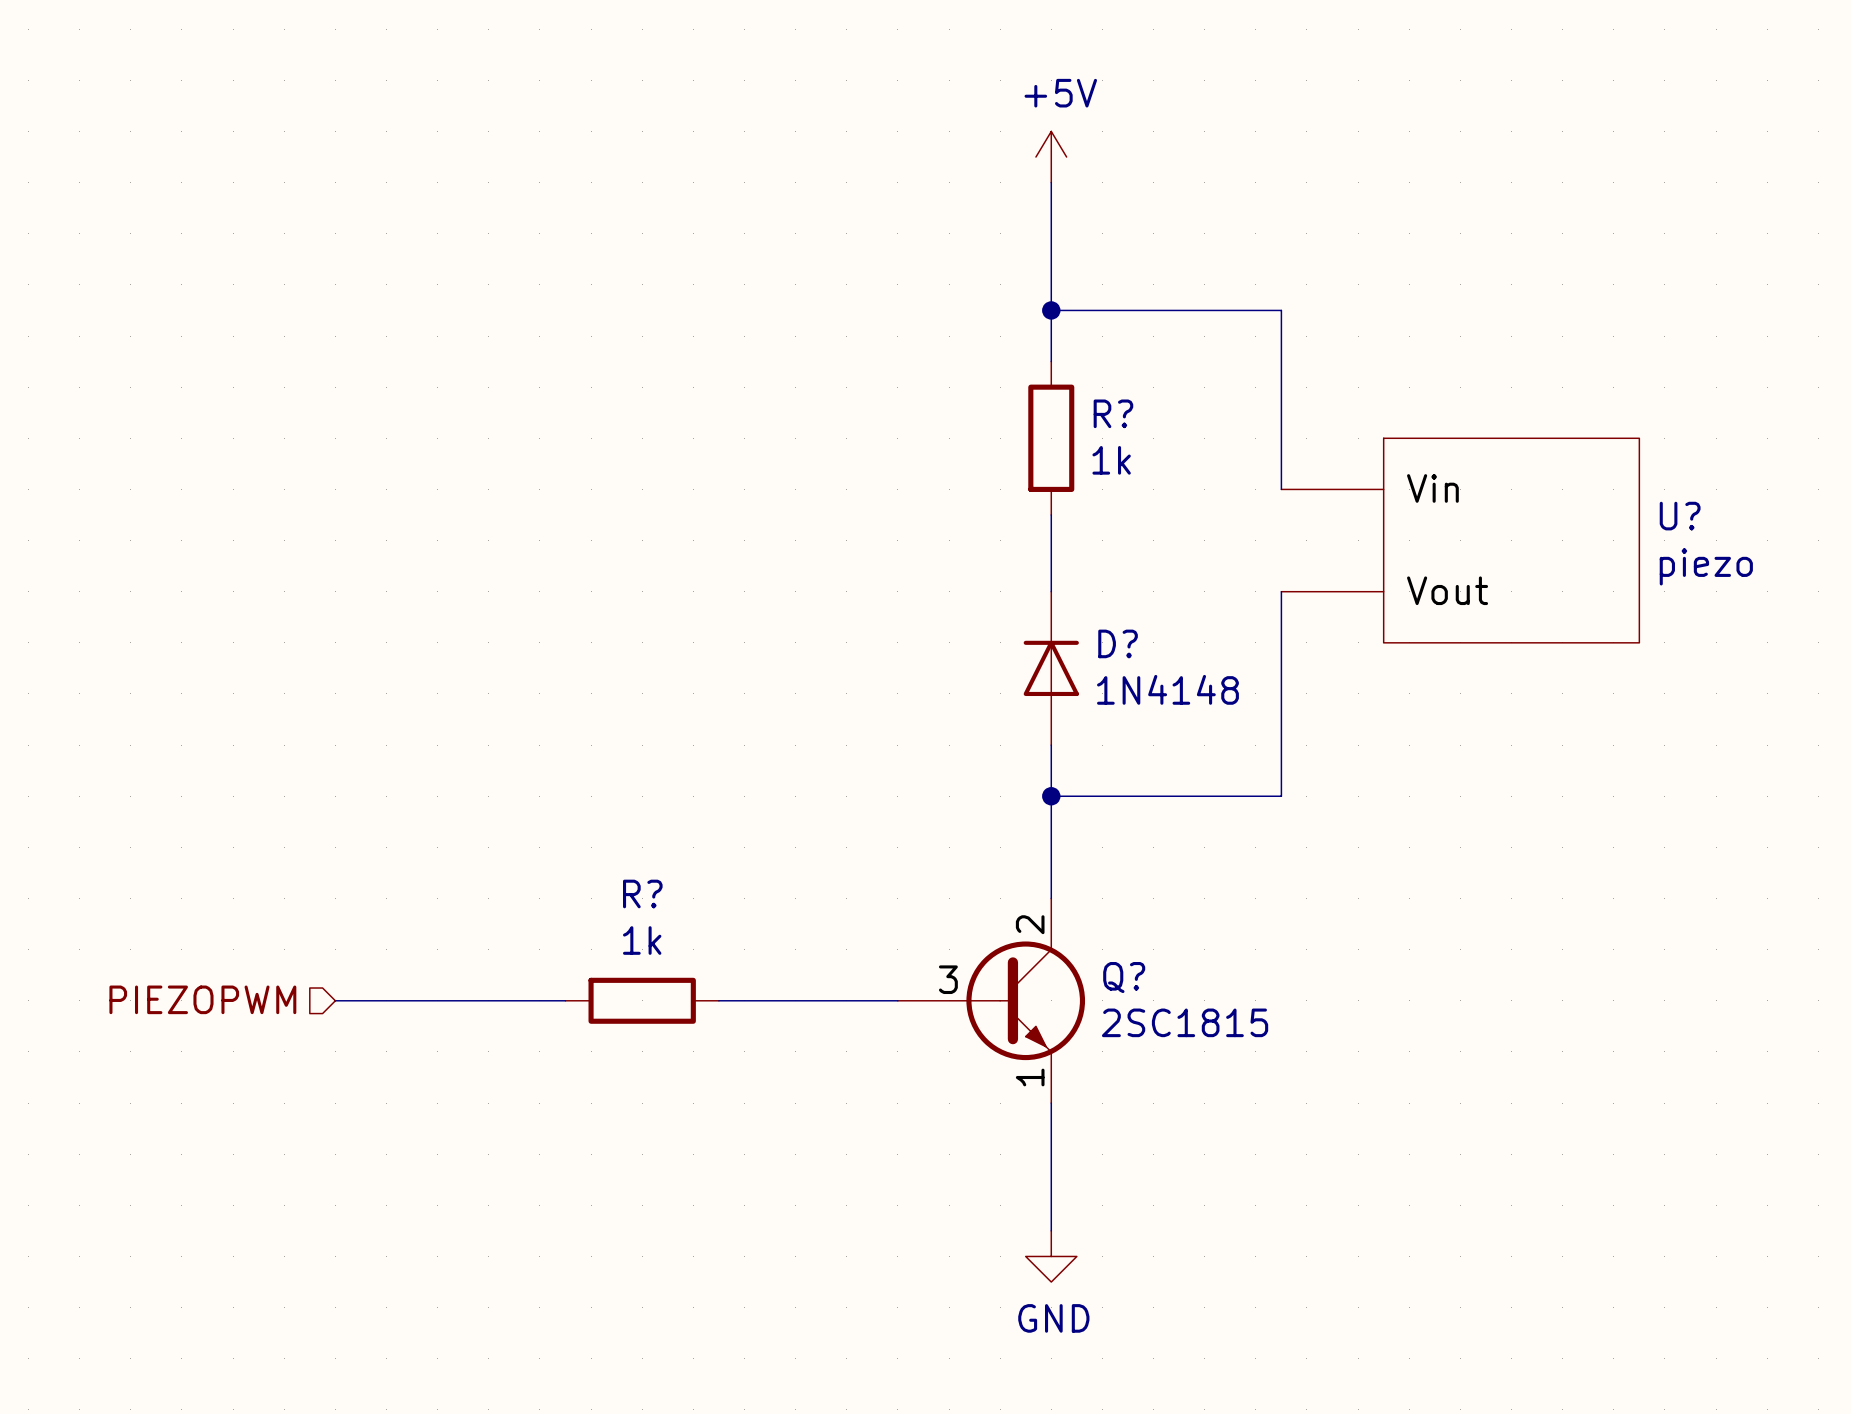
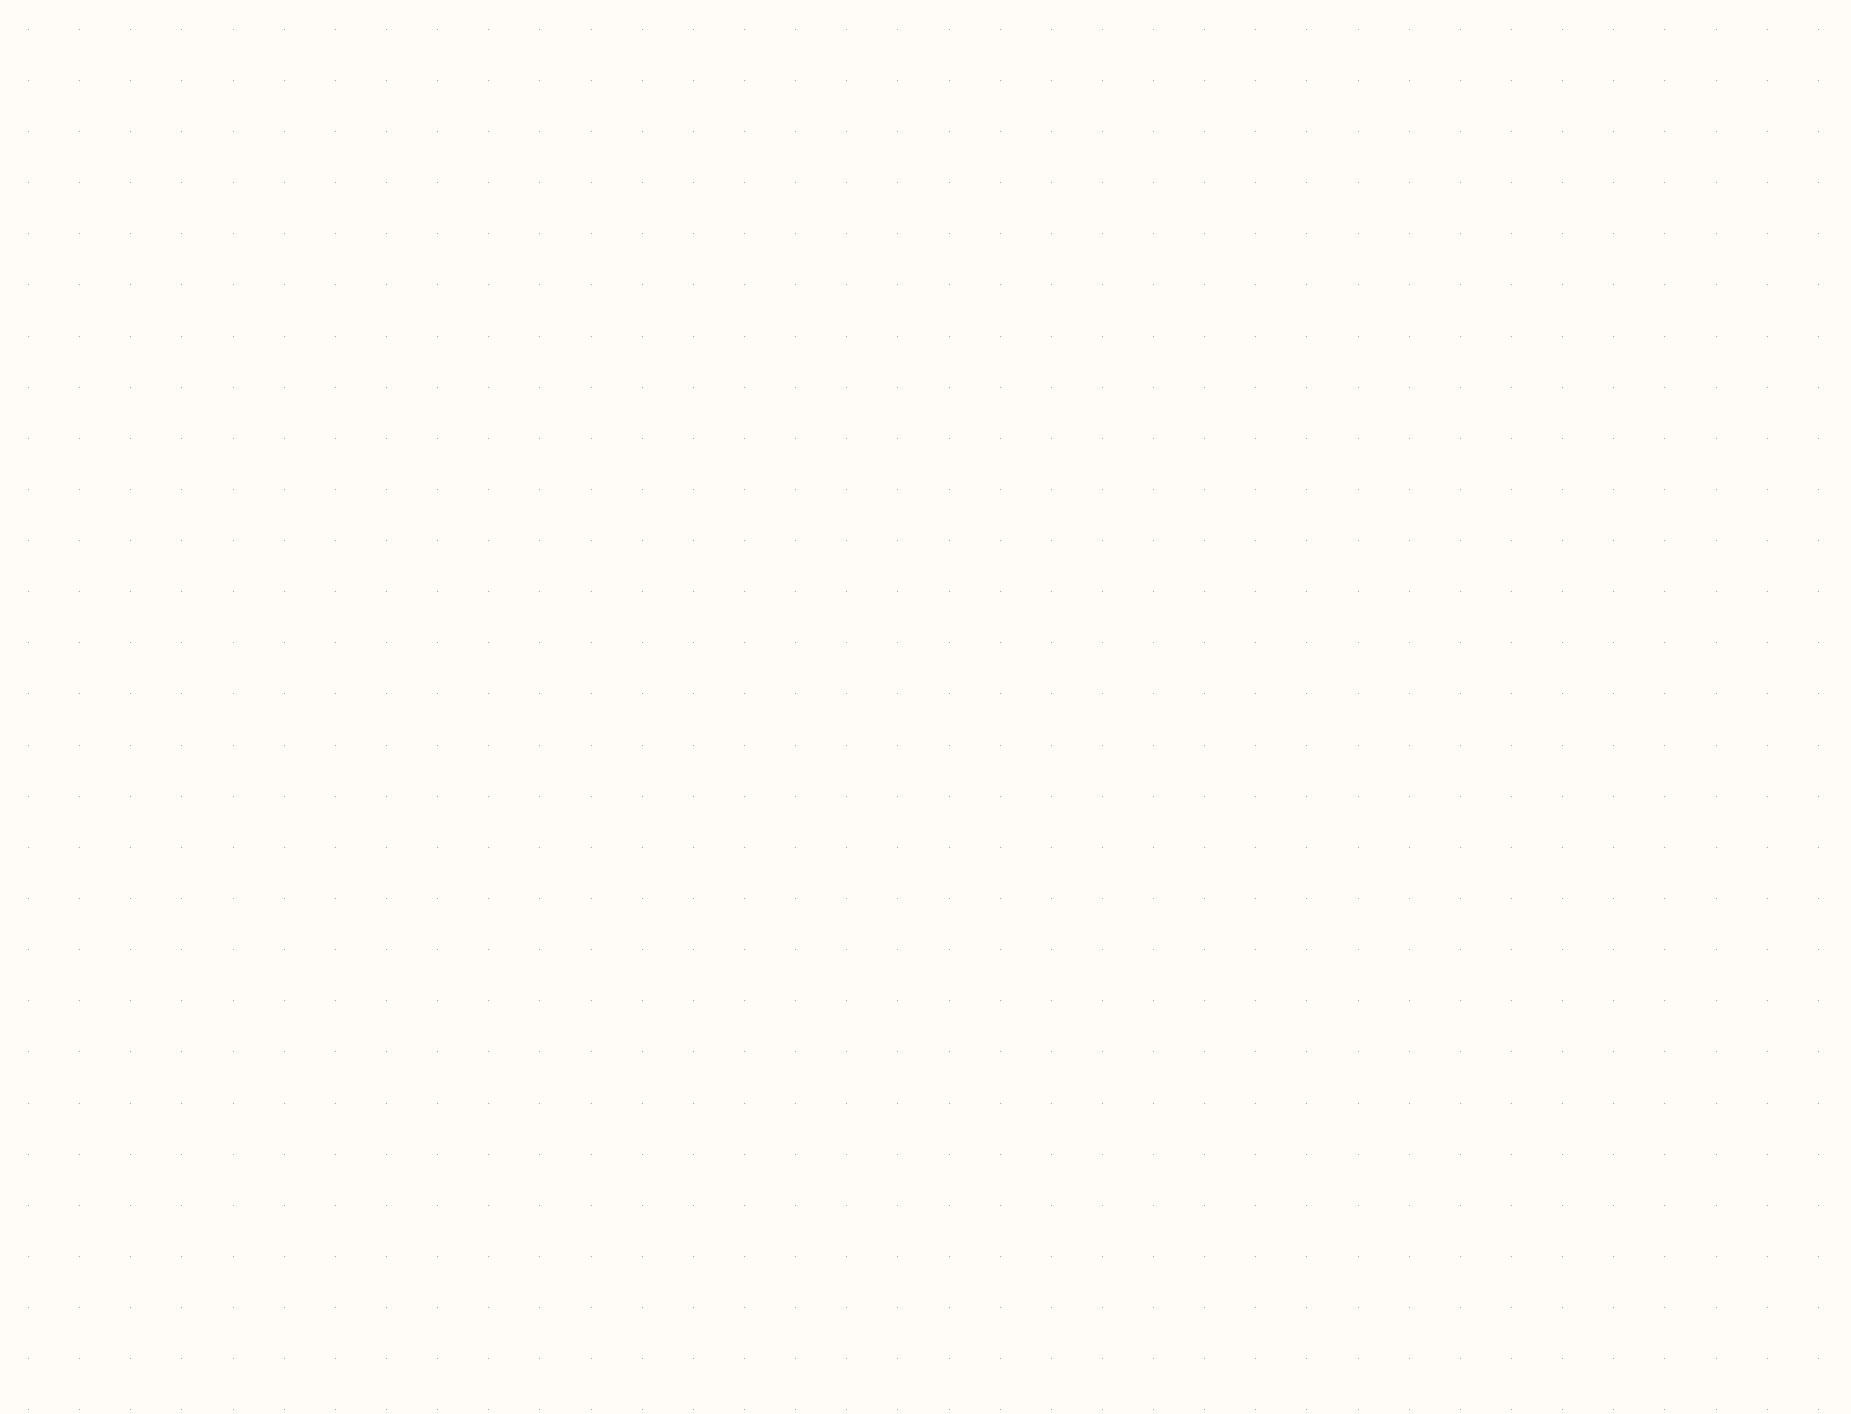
power symbol: +5V (1051, 157) -> none
wire: (1051, 182) (1051, 361) -> none
wire: (1051, 310) (1281, 310) (1281, 489) -> none
junction: (1051, 310) -> none
R?: 1k (1051, 438) -> none
wire: (1051, 514) (1051, 591) -> none
U?: piezo (1460, 540) -> none
wire: (1281, 591) (1281, 796) (1051, 796) -> none
D?: 1N4148 (1051, 668) -> none
wire: (1051, 745) (1051, 898) -> none
junction: (1051, 796) -> none
hierarchical label: PIEZOPWM (202, 999) -> none
wire: (335, 1000) (565, 1000) -> none
R?: 1k (642, 1000) -> none
wire: (718, 1000) (897, 1000) -> none
Q?: 2SC1815 (991, 1000) -> none
wire: (1051, 1103) (1051, 1230) -> none
power symbol: GND (1051, 1256) -> none

